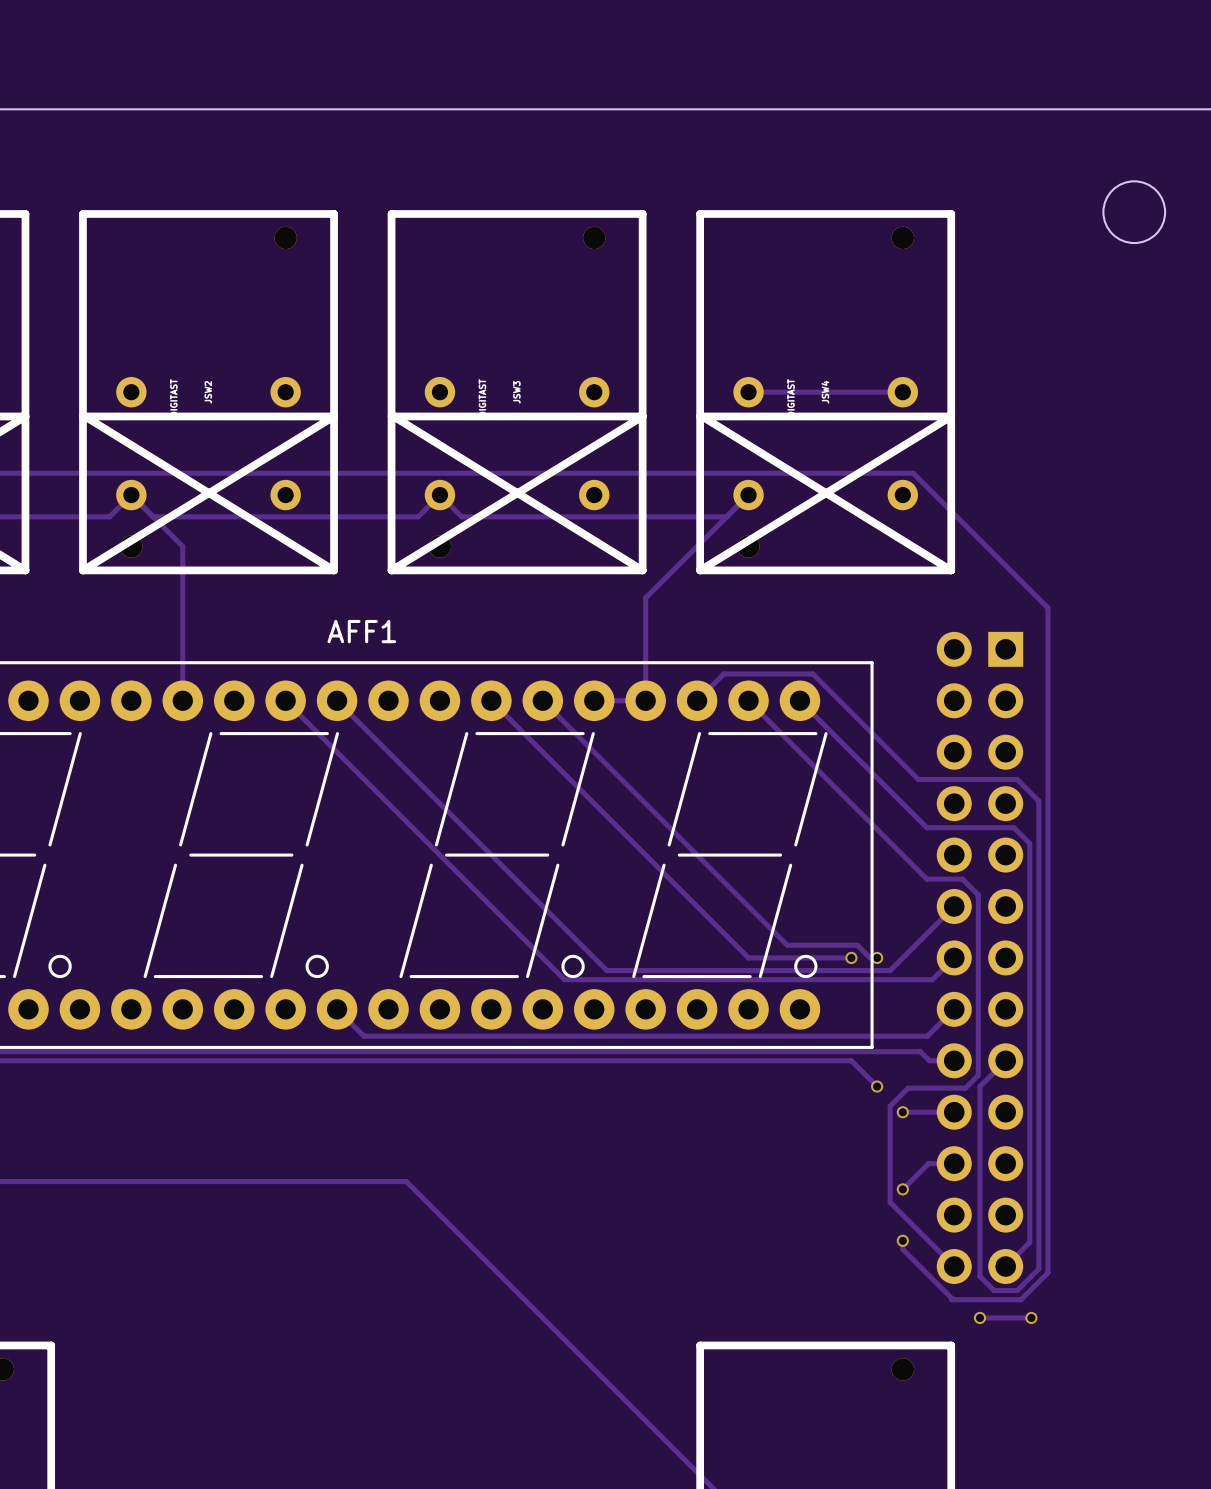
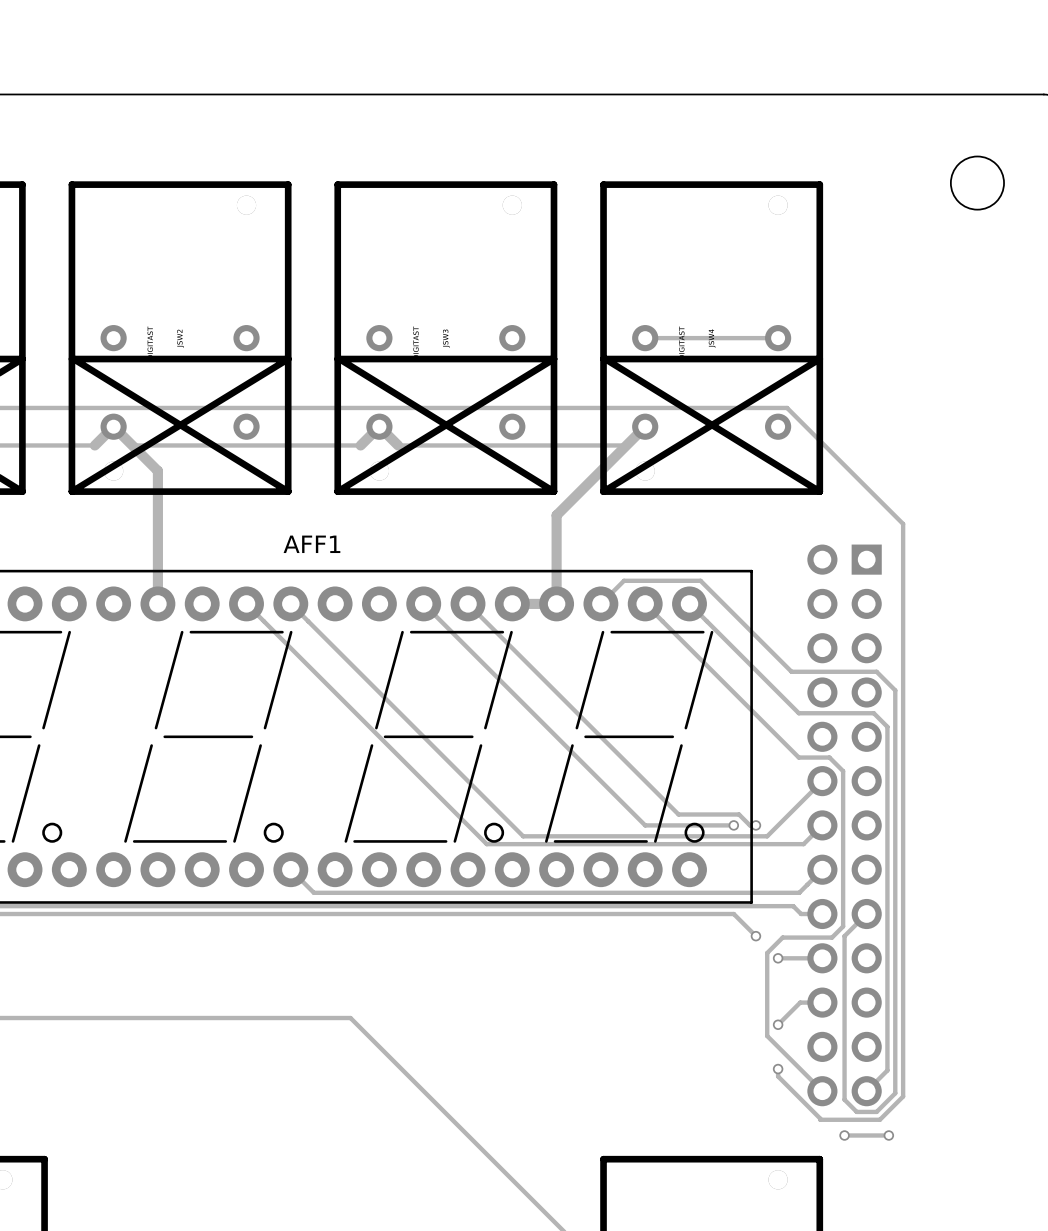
track width: thin (748, 495) (645, 597) (645, 700) (594, 700) -> thick (645, 426) (556, 515) (556, 603) (512, 603)
track width: thin (109, 516) (131, 495) (182, 546) (182, 700) -> thick (94, 445) (113, 426) (157, 471) (157, 603)
track width: thin (418, 516) (439, 495) (461, 516) -> thick (360, 445) (379, 426) (398, 445)

